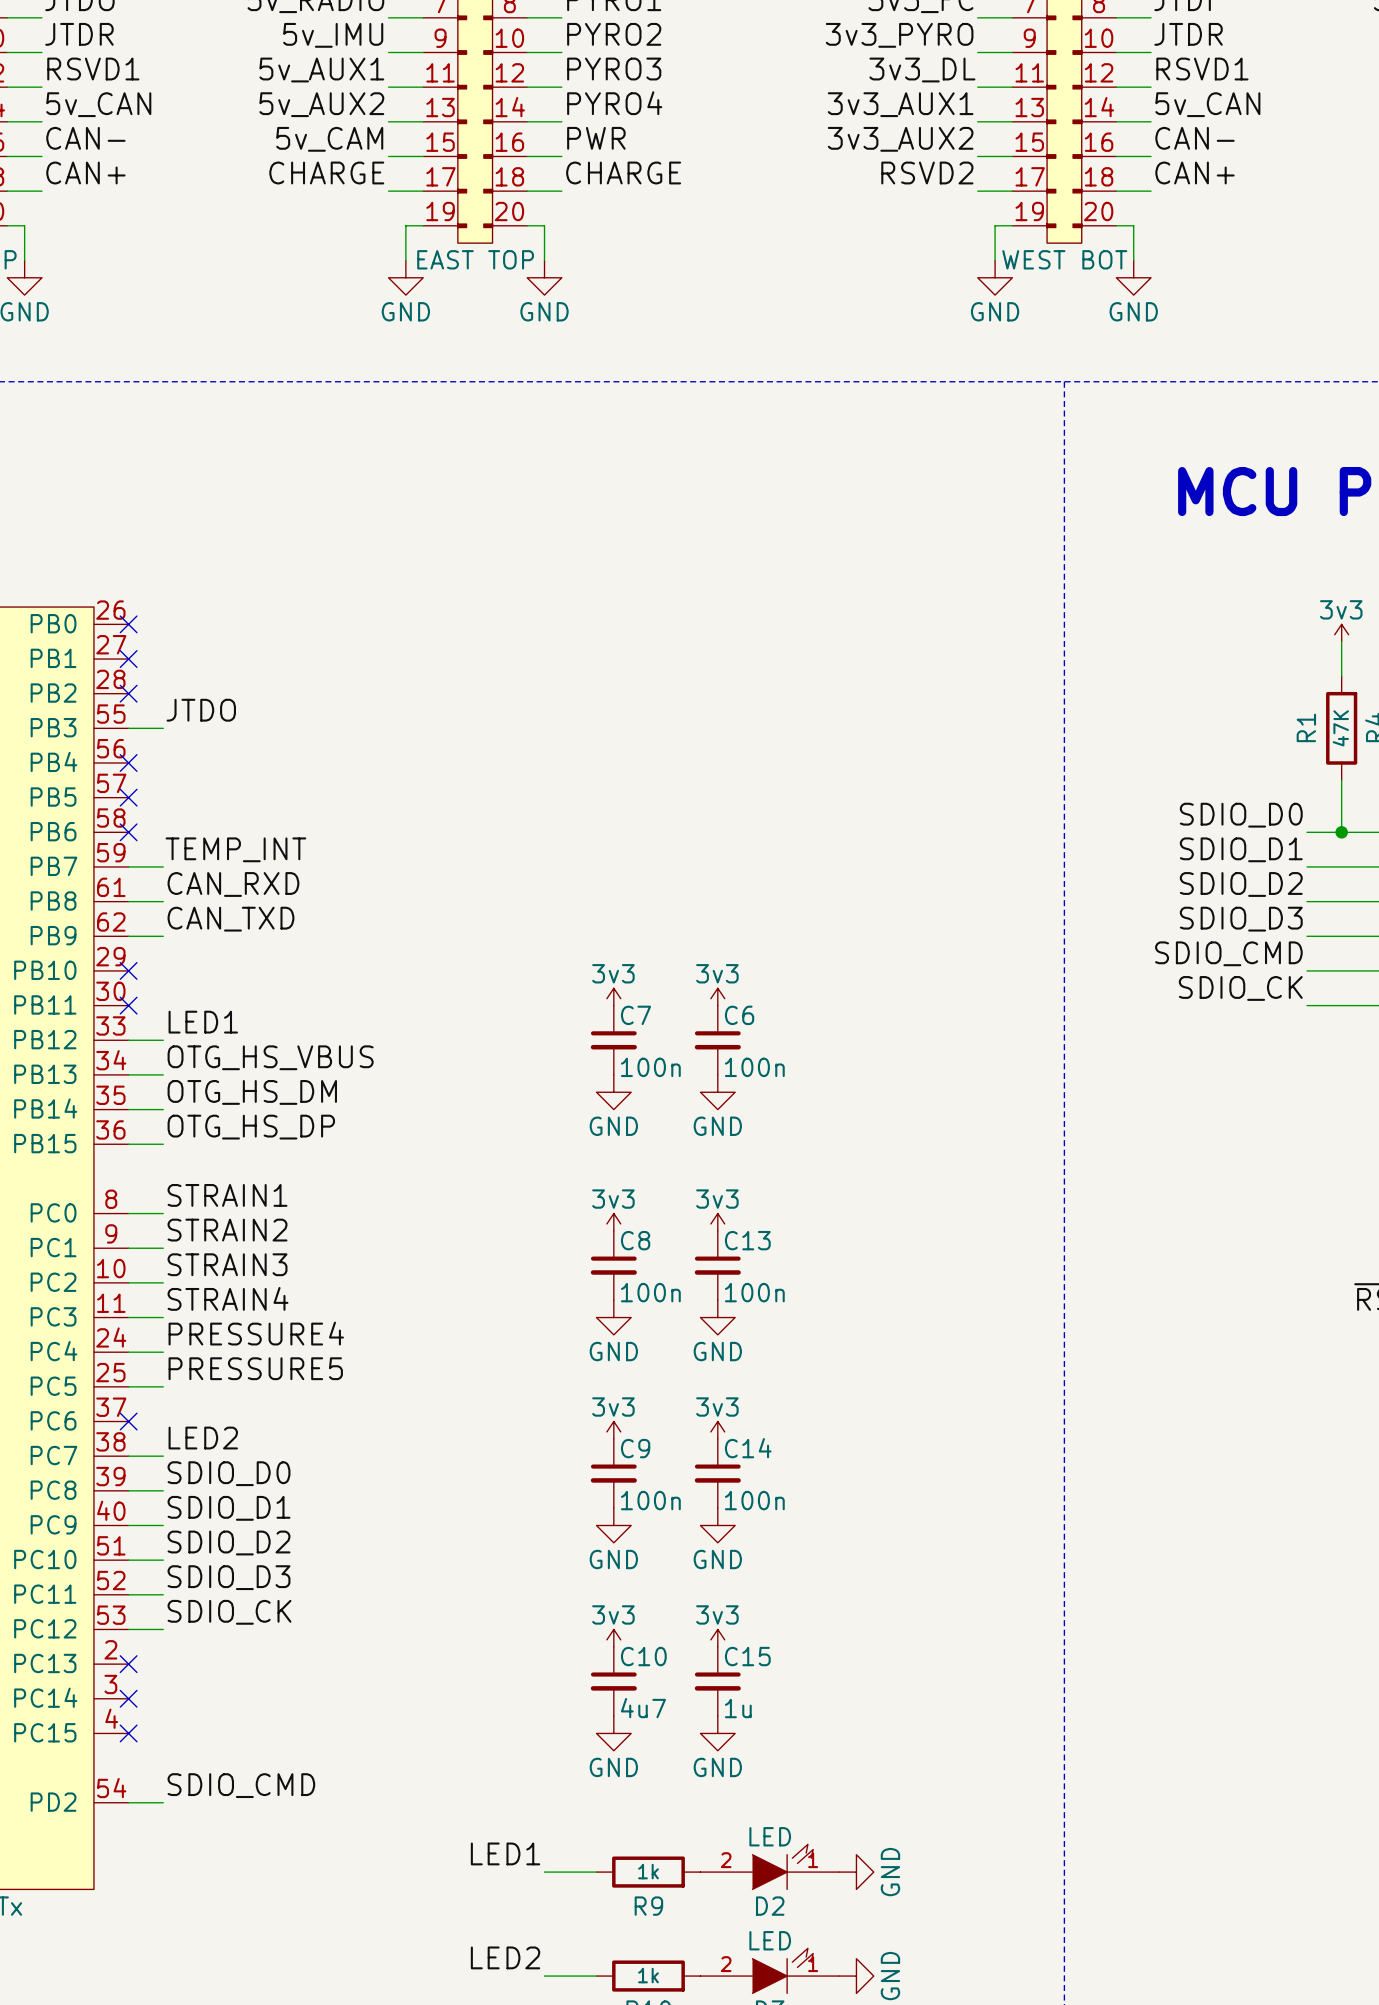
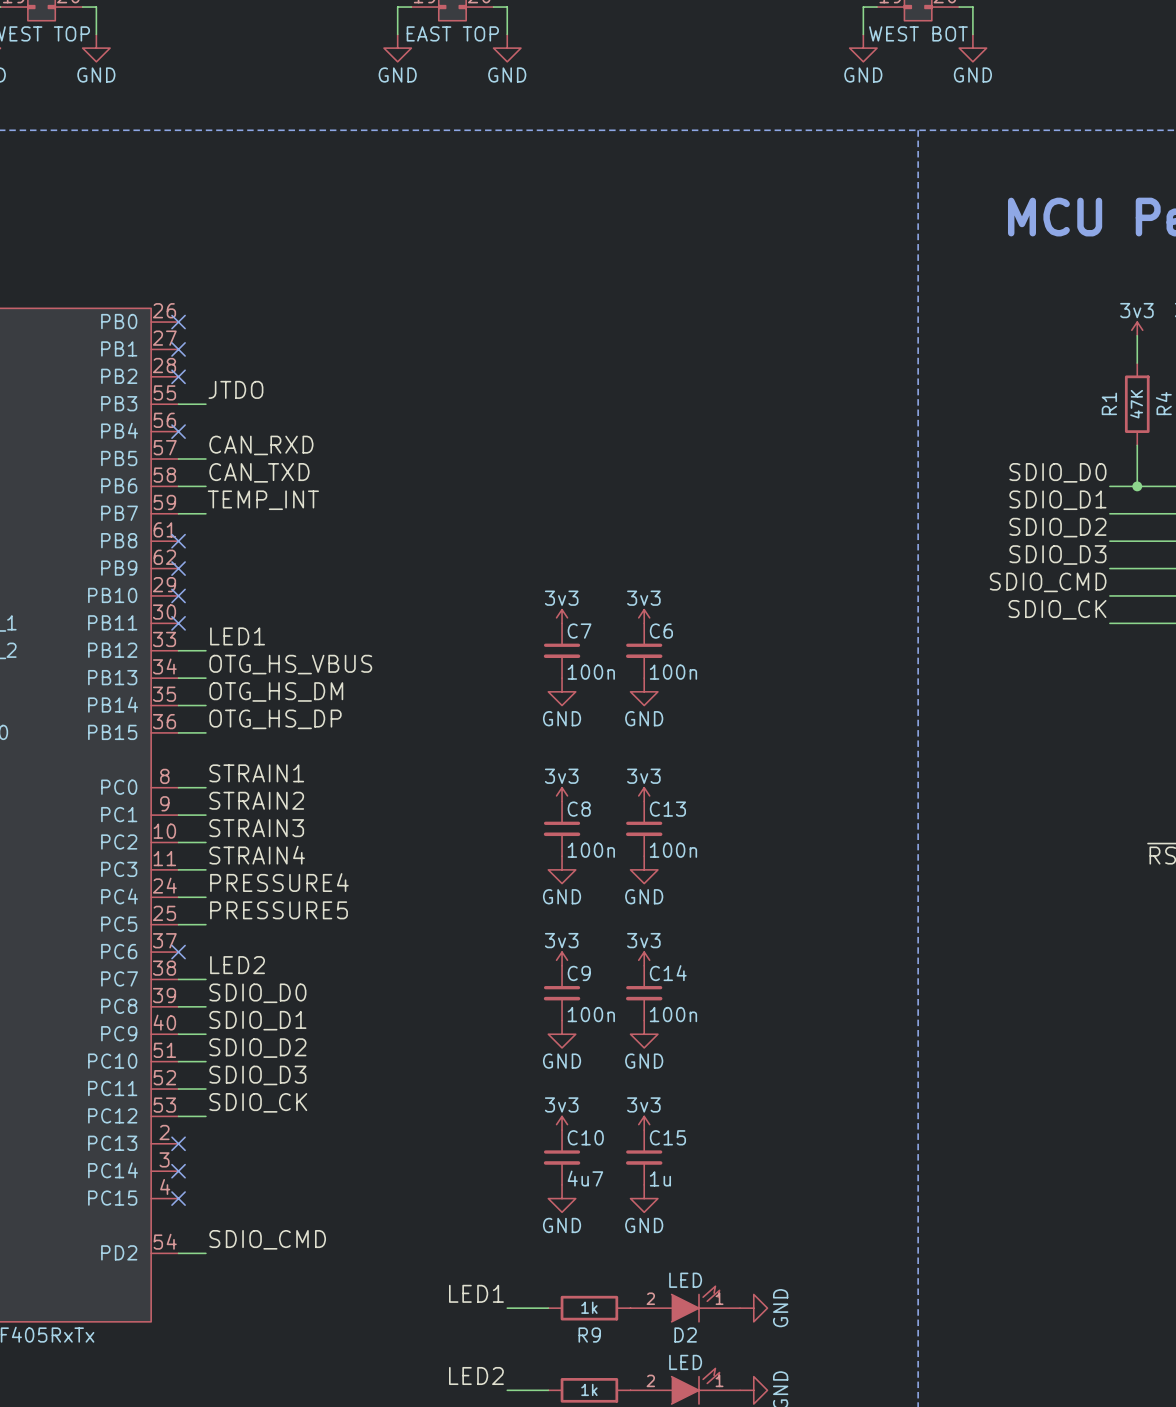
no-connect mark: (128, 797) -> none
no-connect mark: (128, 832) -> none
label position: CAN_RXD (233, 884) -> CAN_RXD (261, 445)
wire: (128, 901) (163, 901) -> (178, 486) (205, 486)
no-connect mark: none -> (178, 541)
label position: CAN_TXD (230, 919) -> CAN_TXD (259, 472)
wire: (128, 936) (163, 936) -> (178, 459) (205, 459)
no-connect mark: none -> (178, 568)

